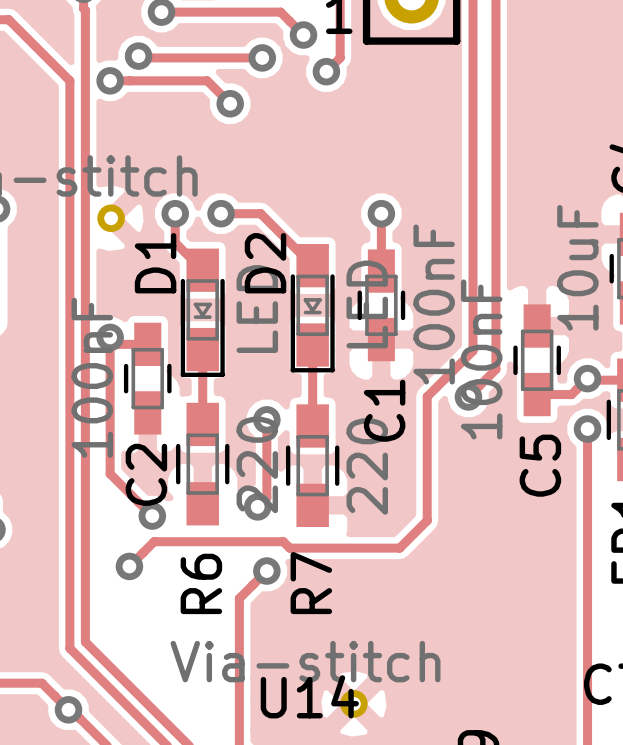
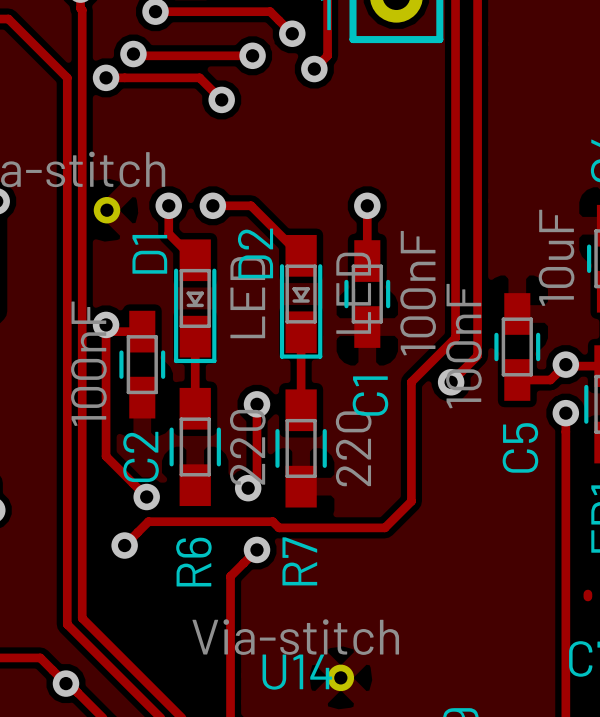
track: none -> (587, 594) (587, 596)

